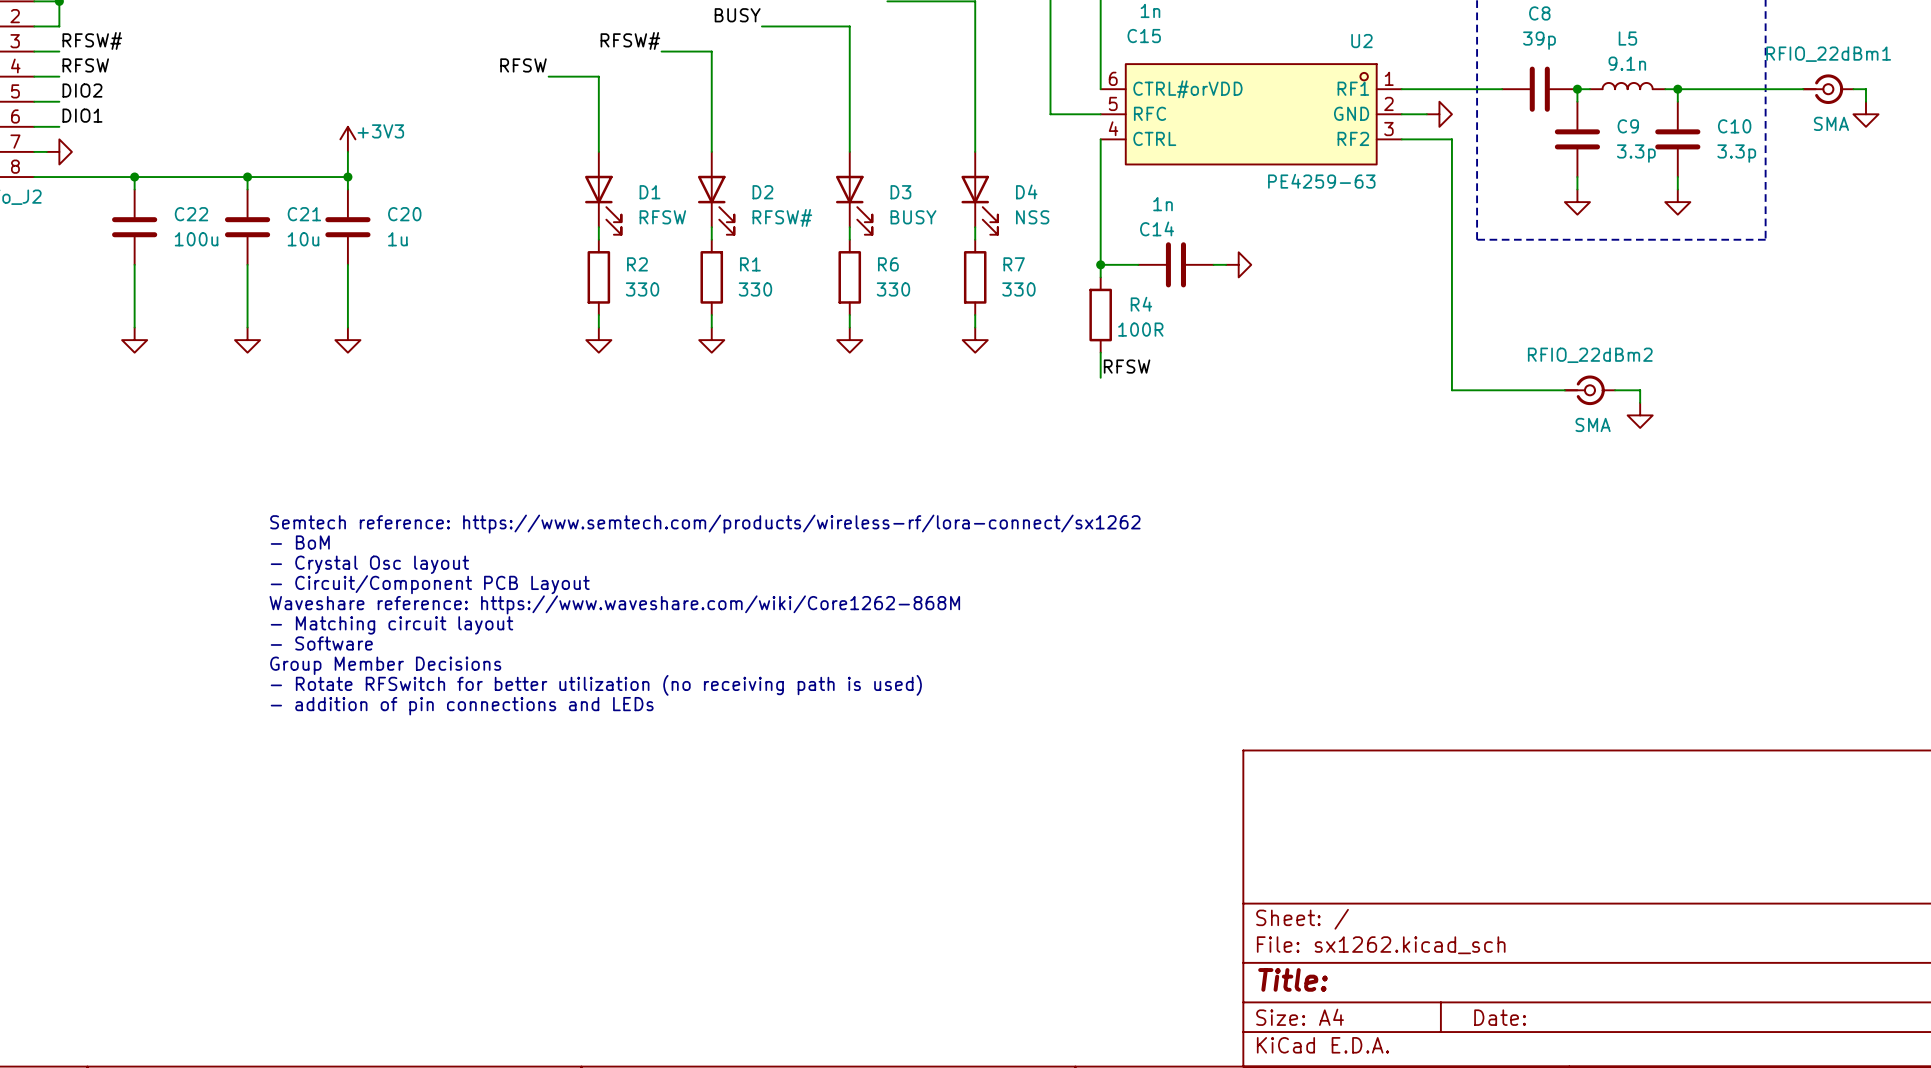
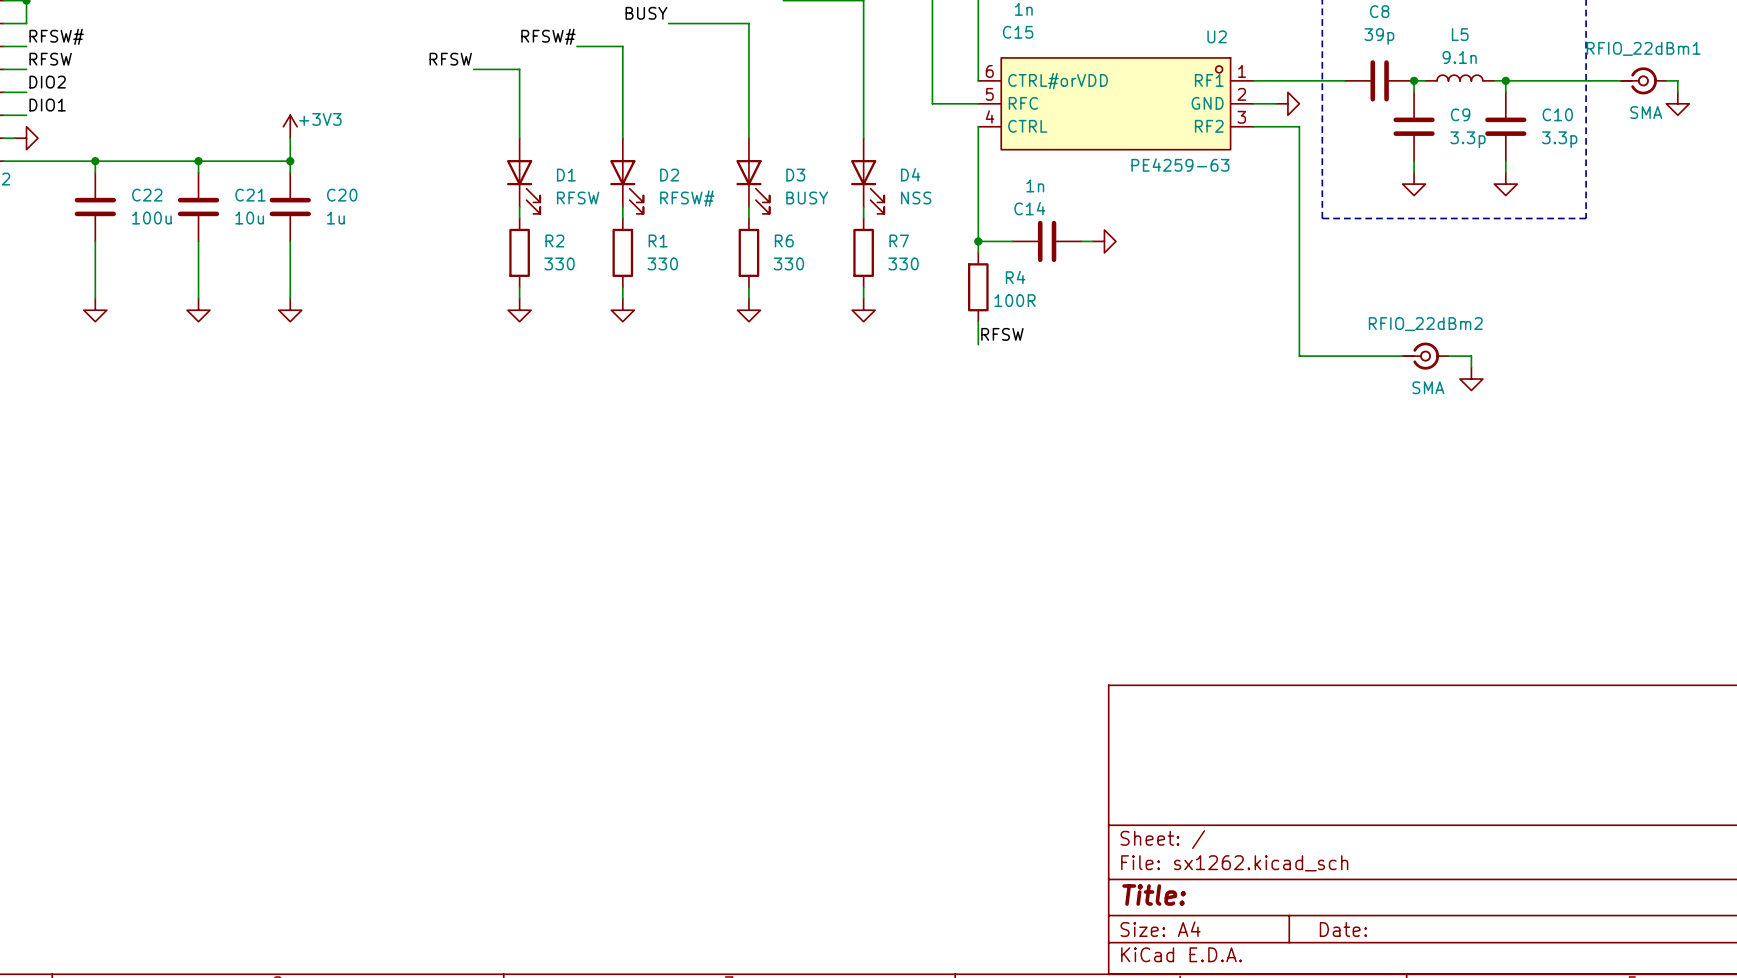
text: Semtech reference: https://www.semtech.com/products/wireless-rf/lora-connect/sx1262 (705, 524) -> none
text: - BoM (300, 542) -> none
text: - Crystal Osc layout (369, 564) -> none
text: - Circuit/Component PCB Layout (430, 584) -> none
text: Waveshare reference: https://www.waveshare.com/wiki/Core1262-868M (614, 604) -> none
text: - Matching circuit layout (391, 625) -> none
text: - Software (321, 643) -> none
text: Group Member Decisions (385, 665) -> none
text: - Rotate RFSwitch for better utilization (no receiving path is used) (596, 685) -> none
text: - addition of pin connections and LEDs (462, 706) -> none

